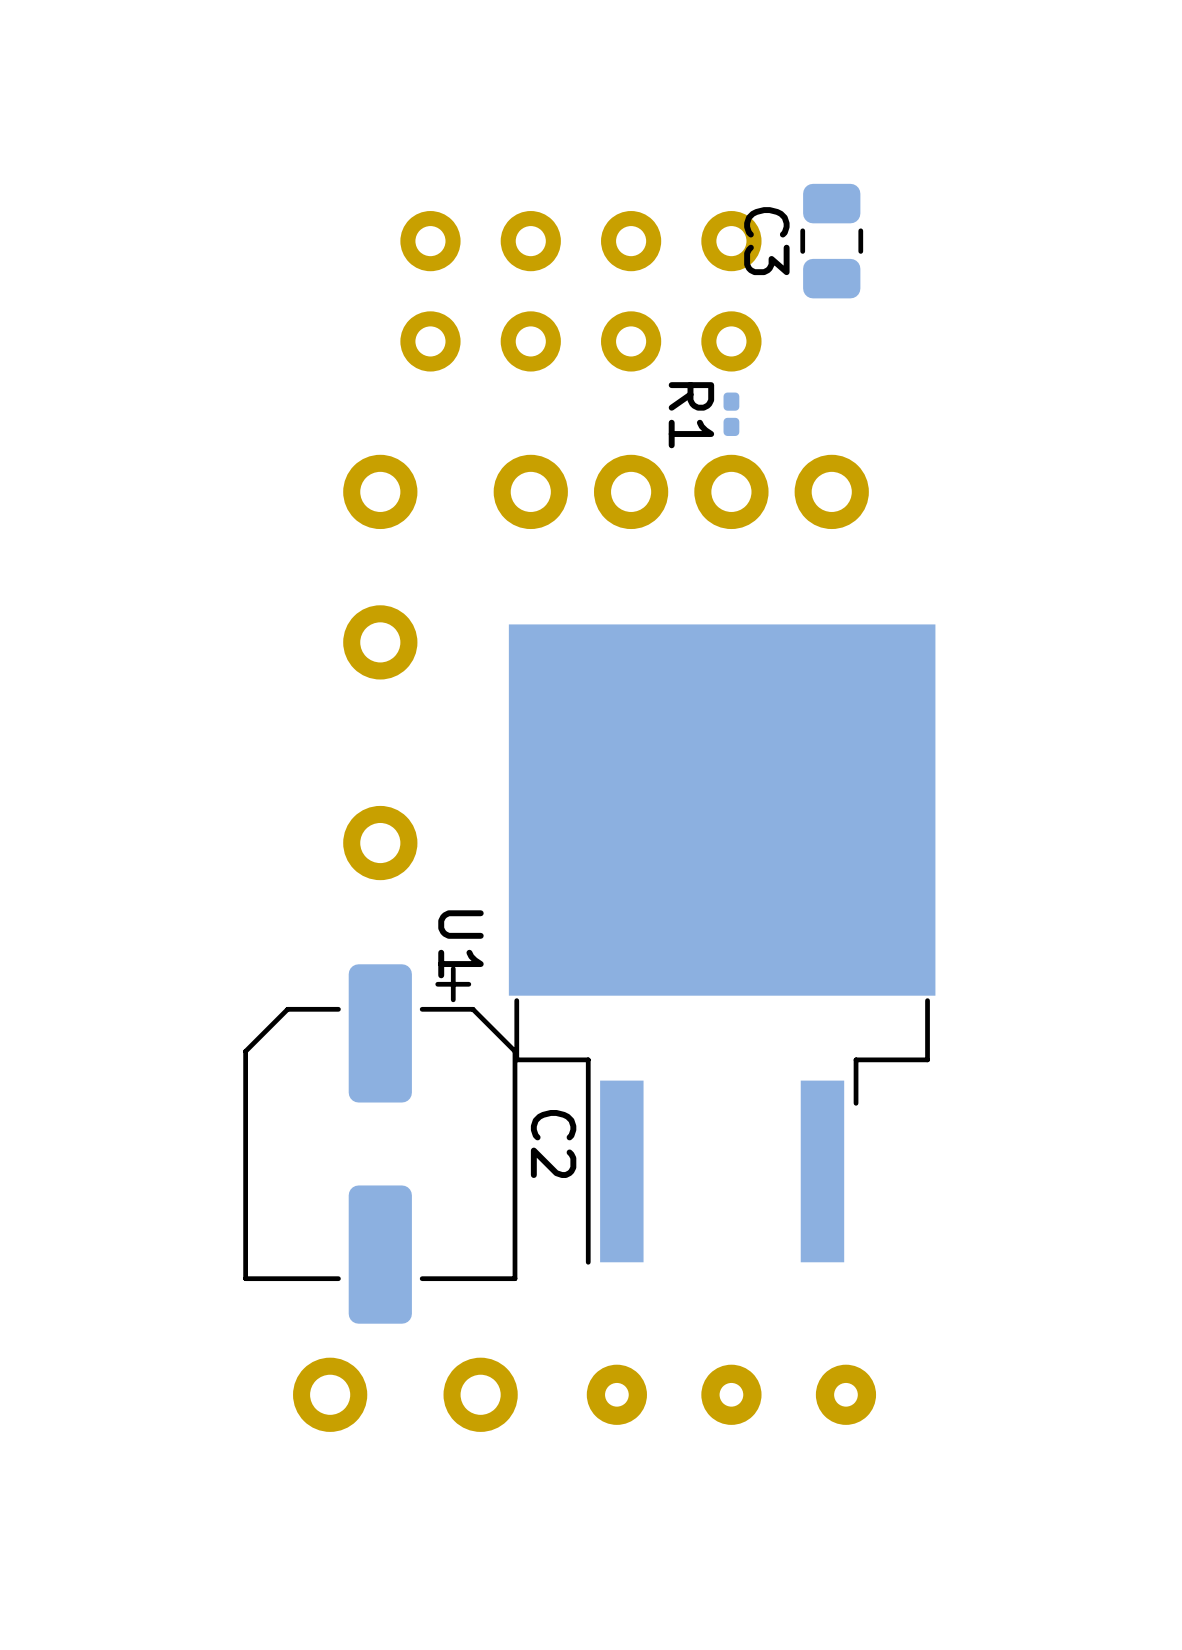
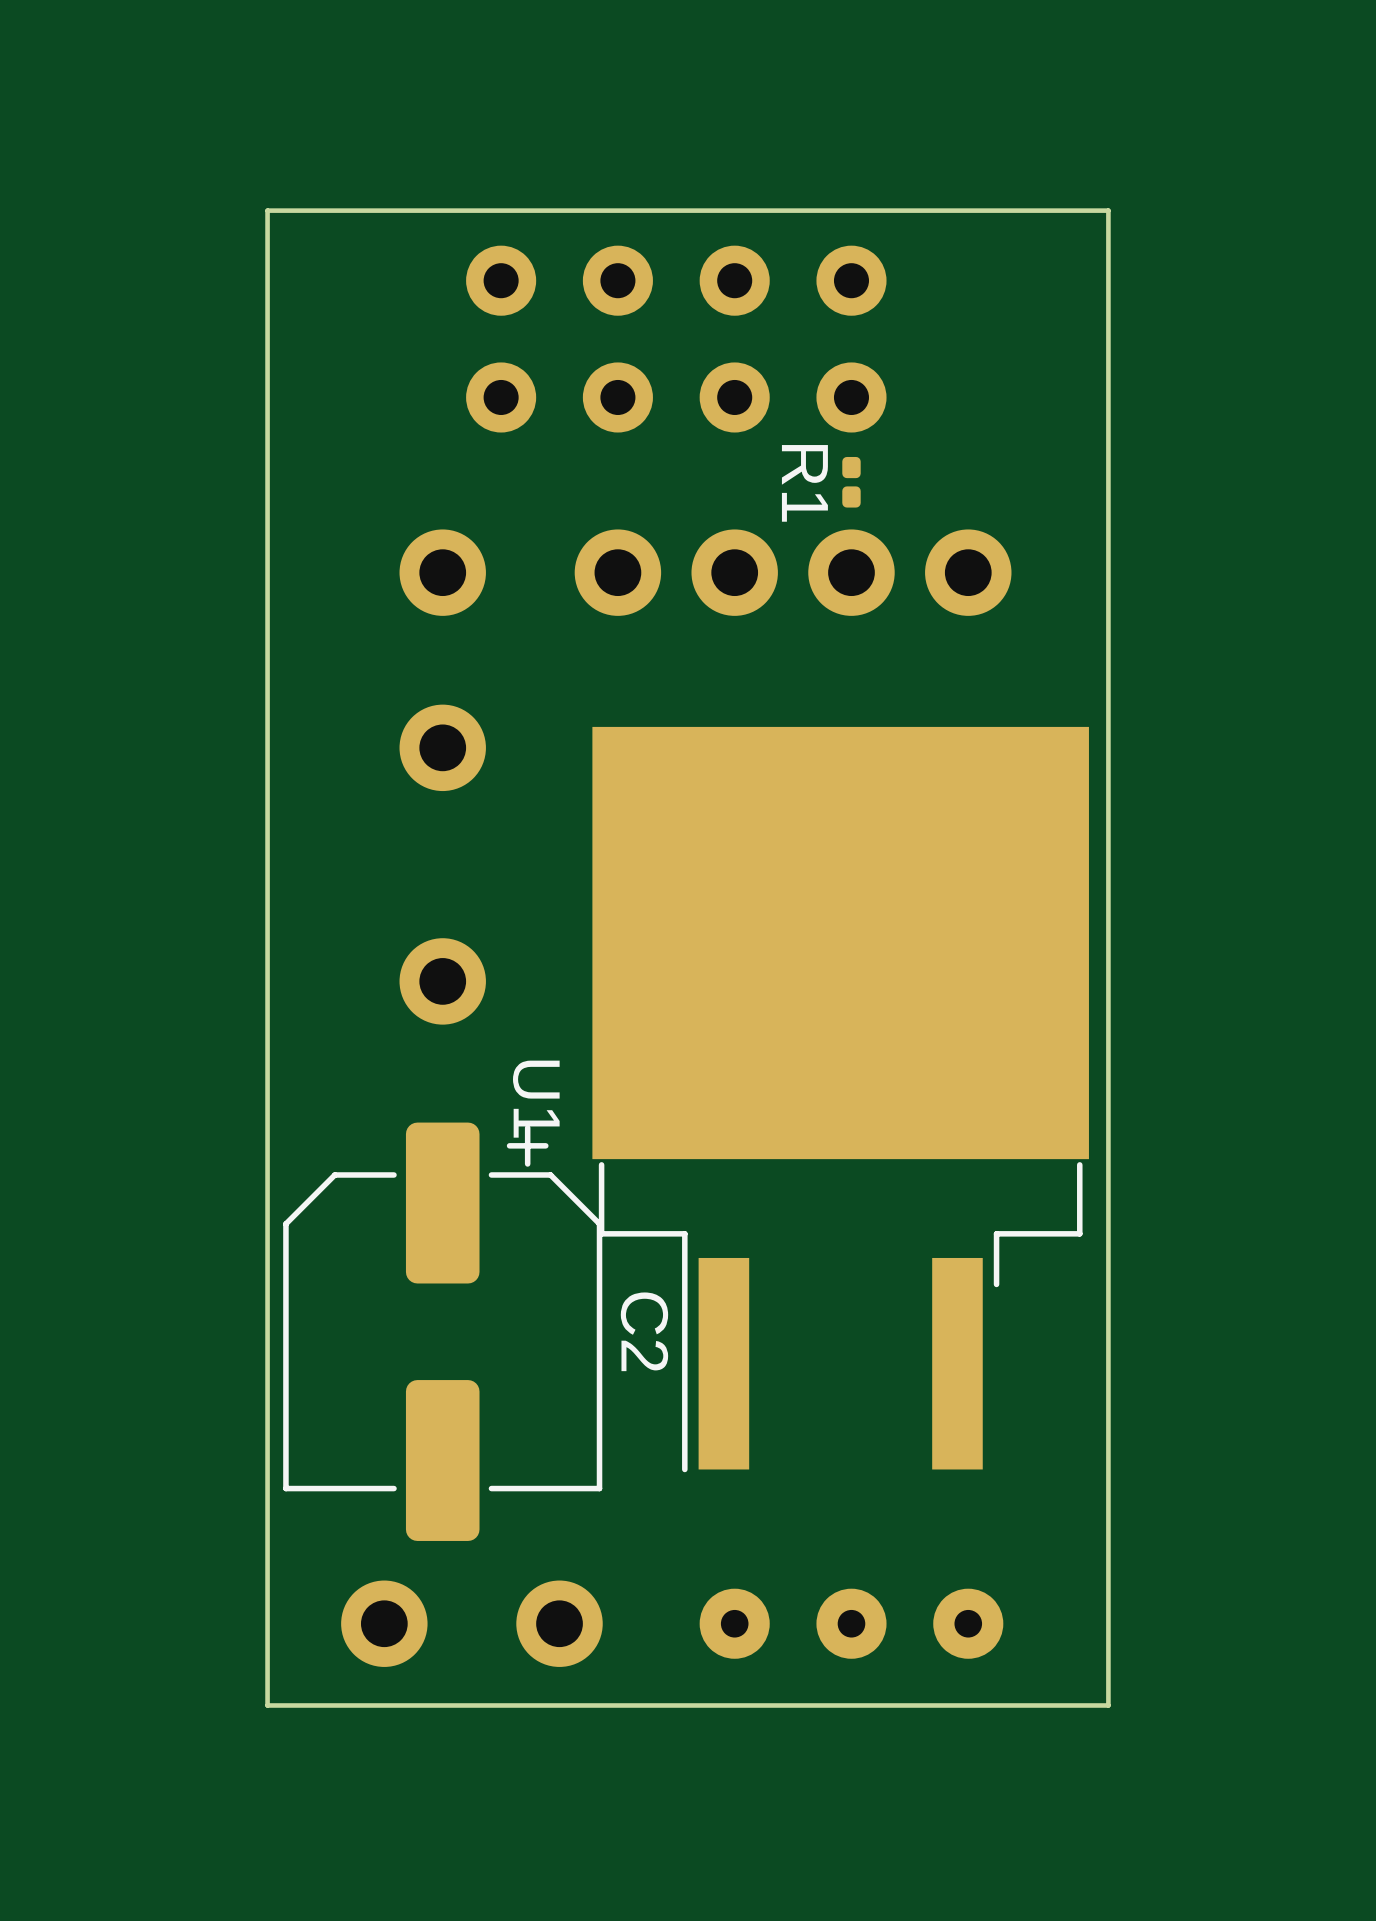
board edge: none -> (1108, 210) (267, 210) (267, 1705) (1108, 1705) (1108, 210)
C3: (831, 241) -> none
part footprint: [586, 1364, 877, 1425] -> [699, 1588, 1004, 1659]

